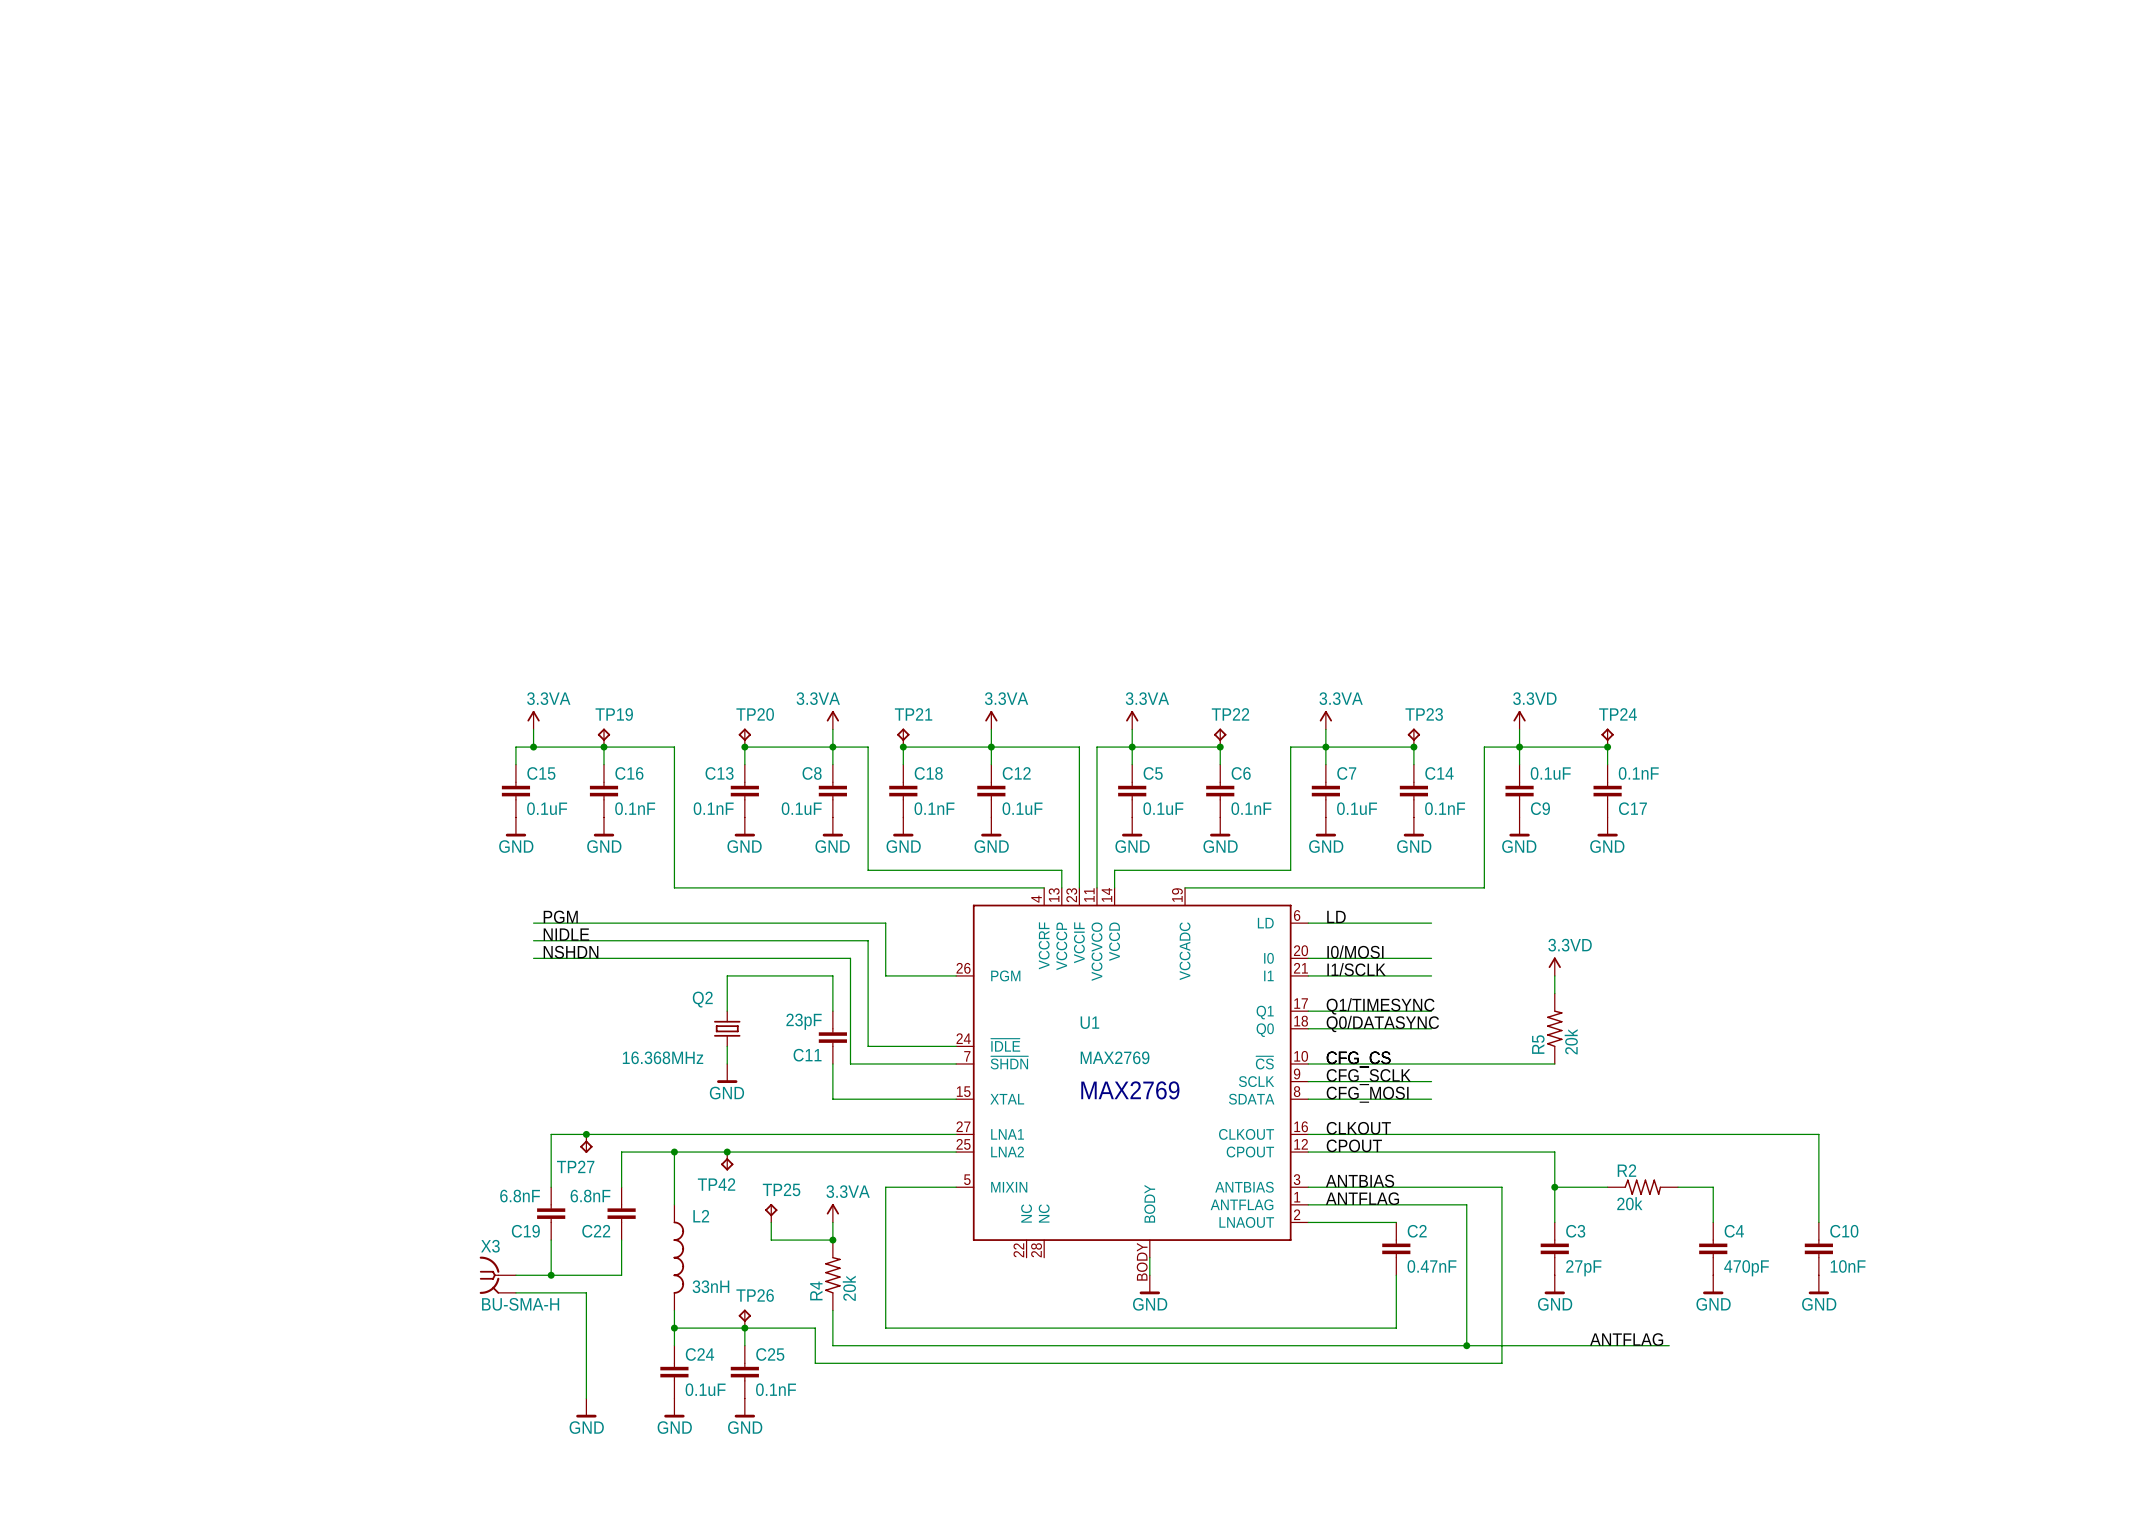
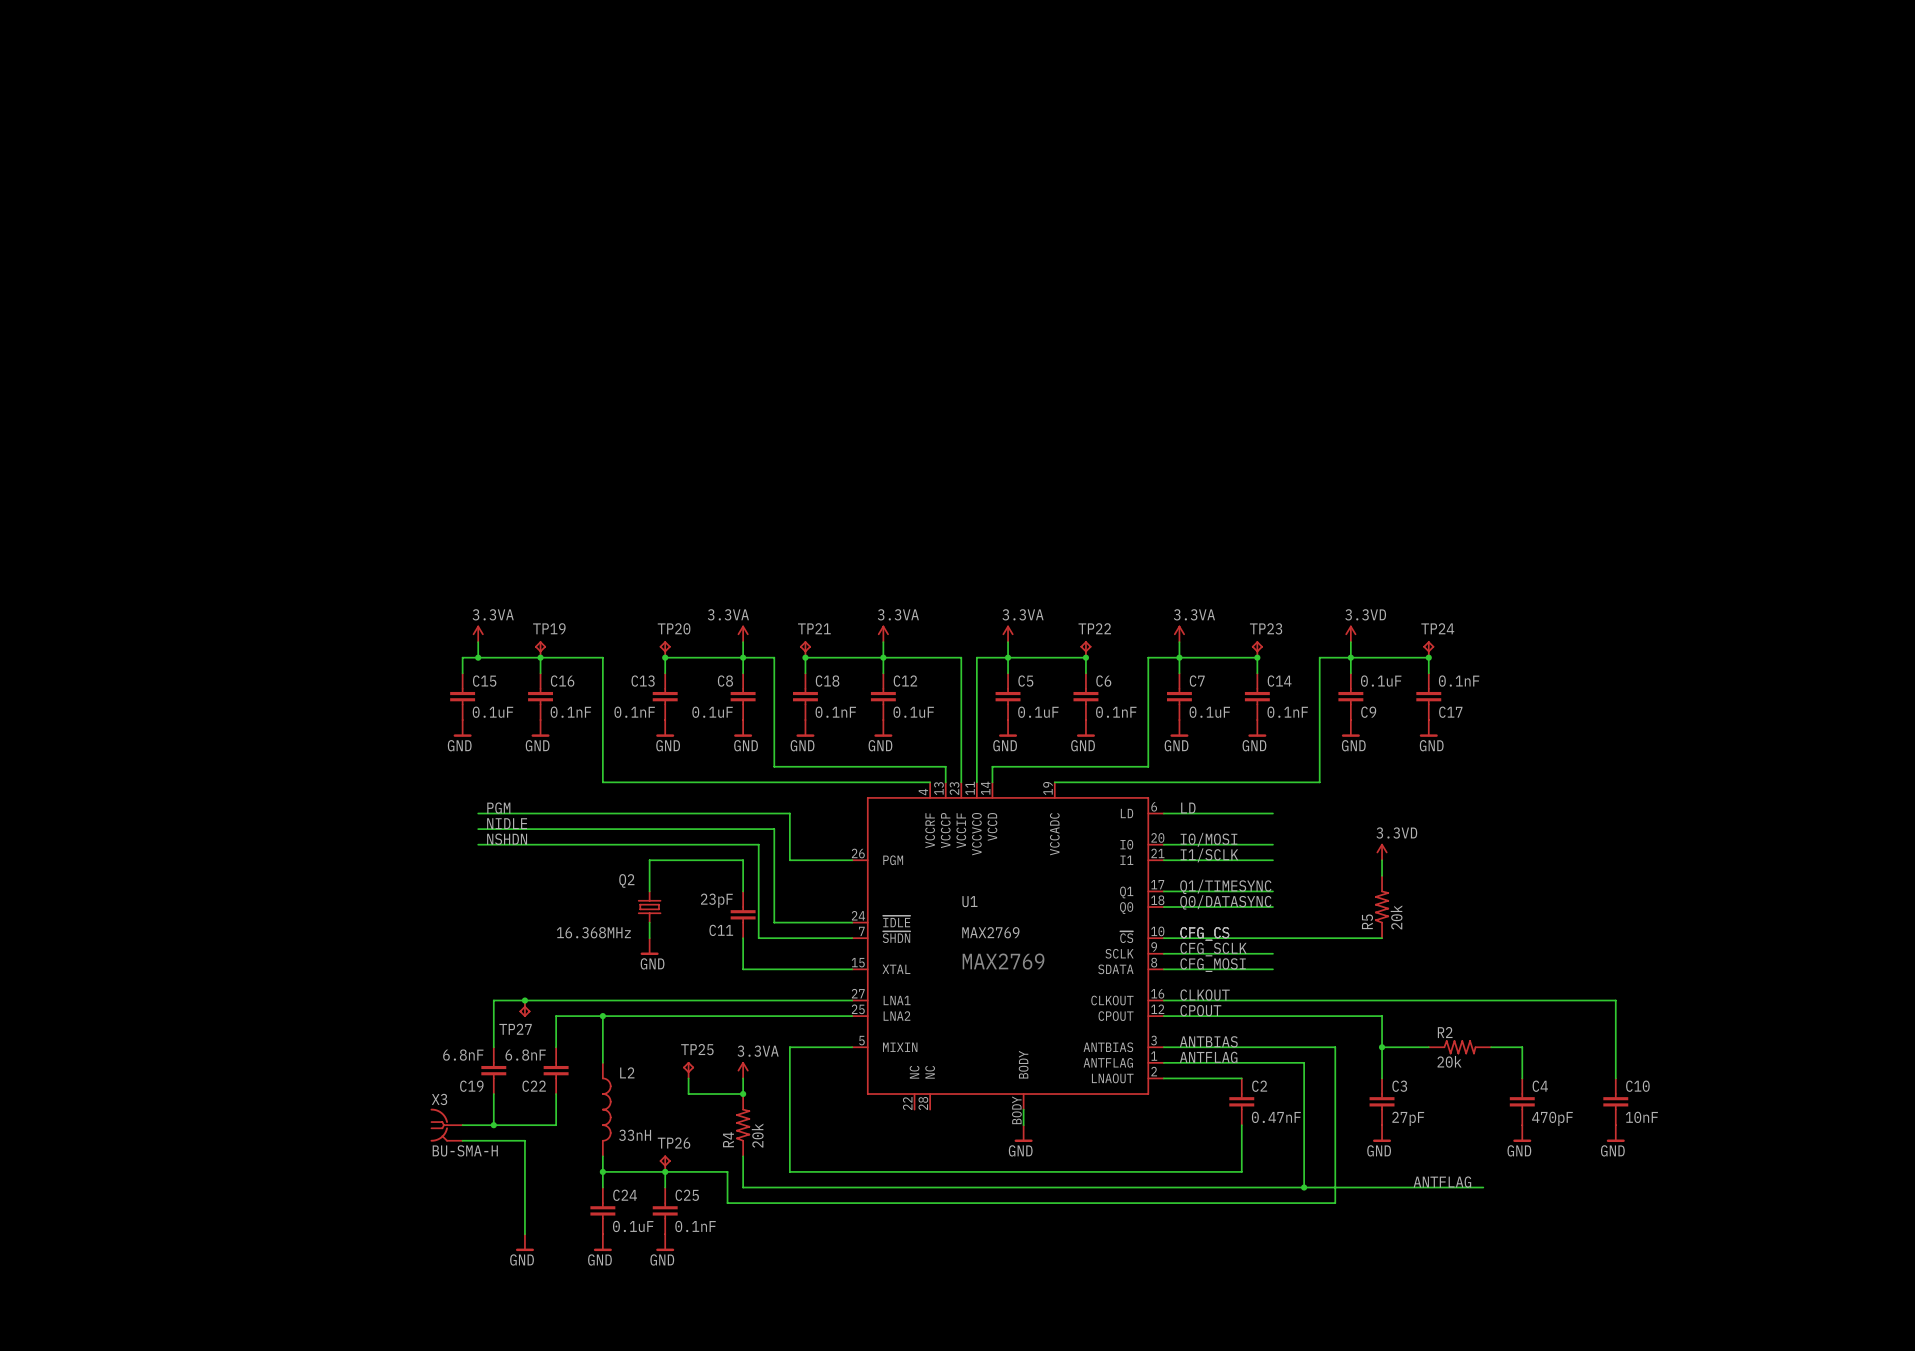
junction: (727, 1152) -> none
TP42: (727, 1161) -> none

